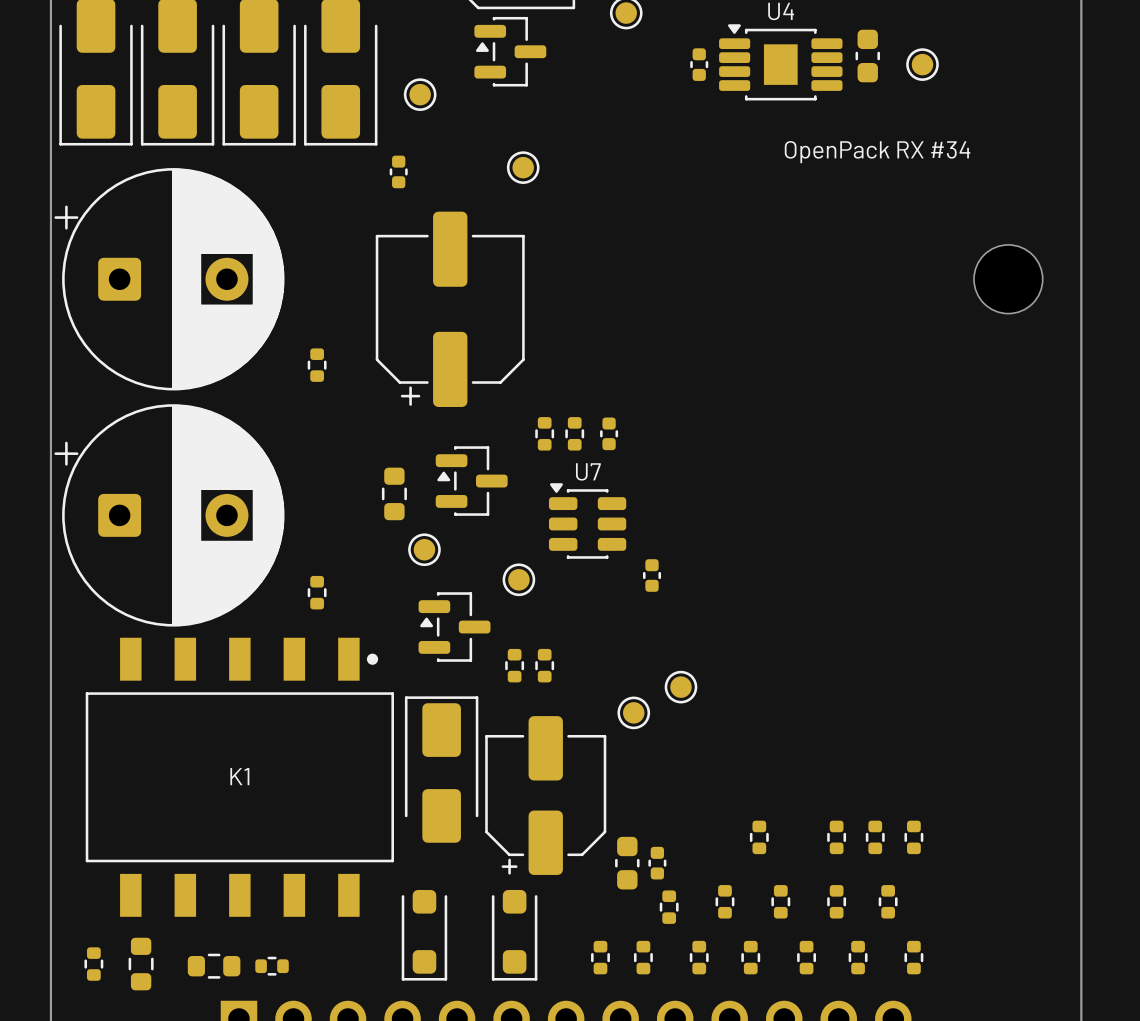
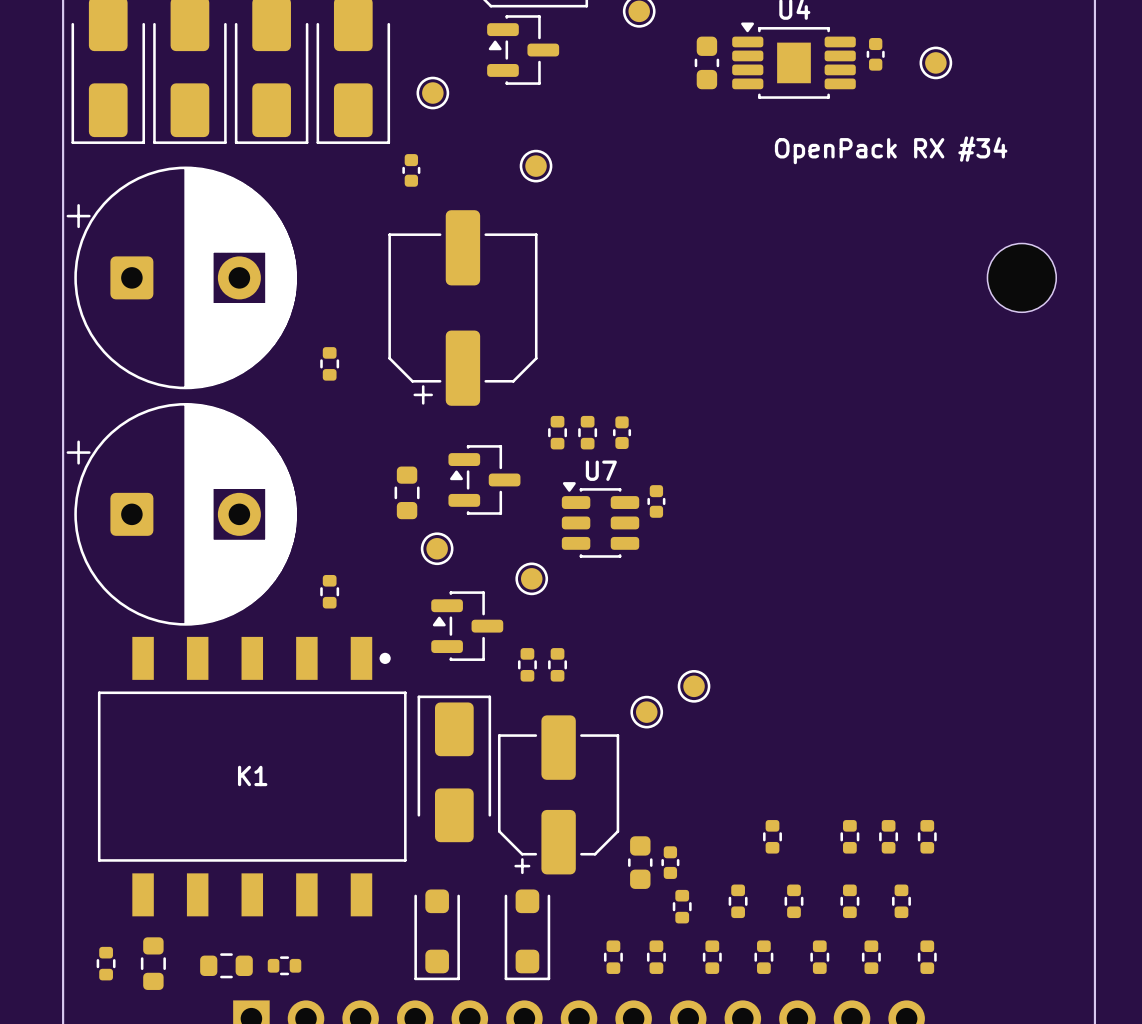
part footprint: [855, 29, 880, 83] -> [866, 37, 885, 71]
part footprint: [690, 48, 709, 81] -> [694, 36, 720, 90]
part position: (652, 575) -> (656, 501)

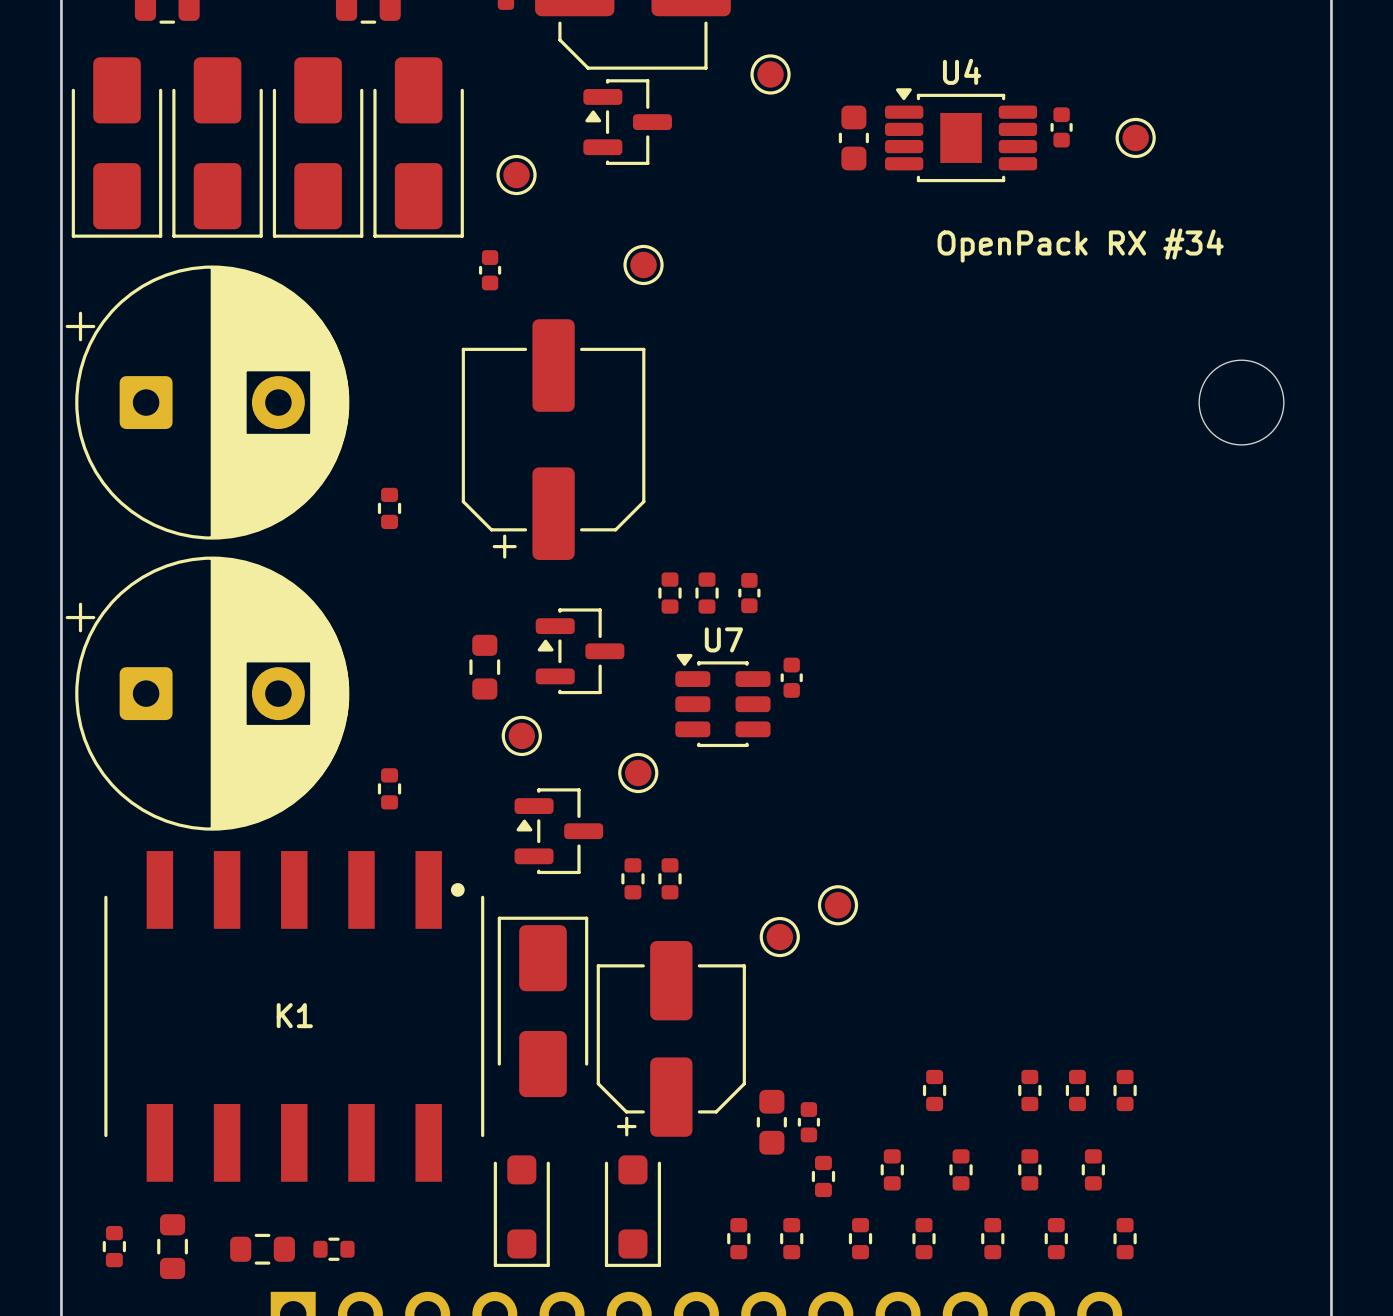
K1 footprint: [97, 636, 407, 917] -> [104, 851, 485, 1182]

